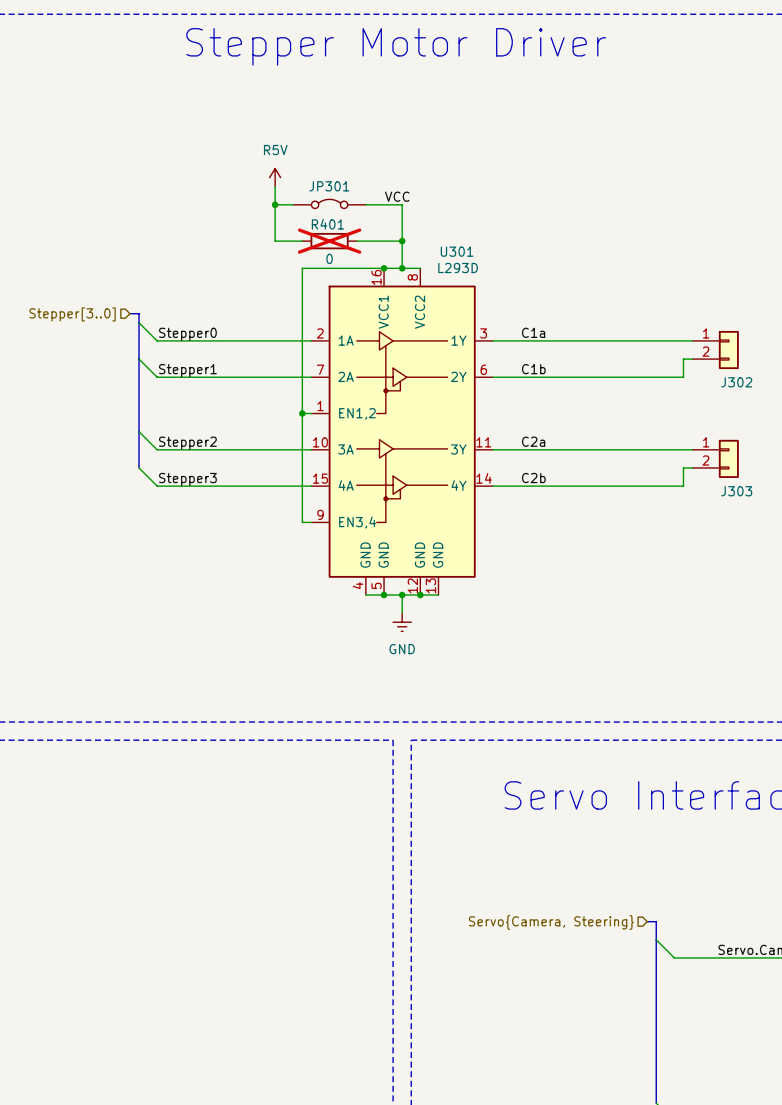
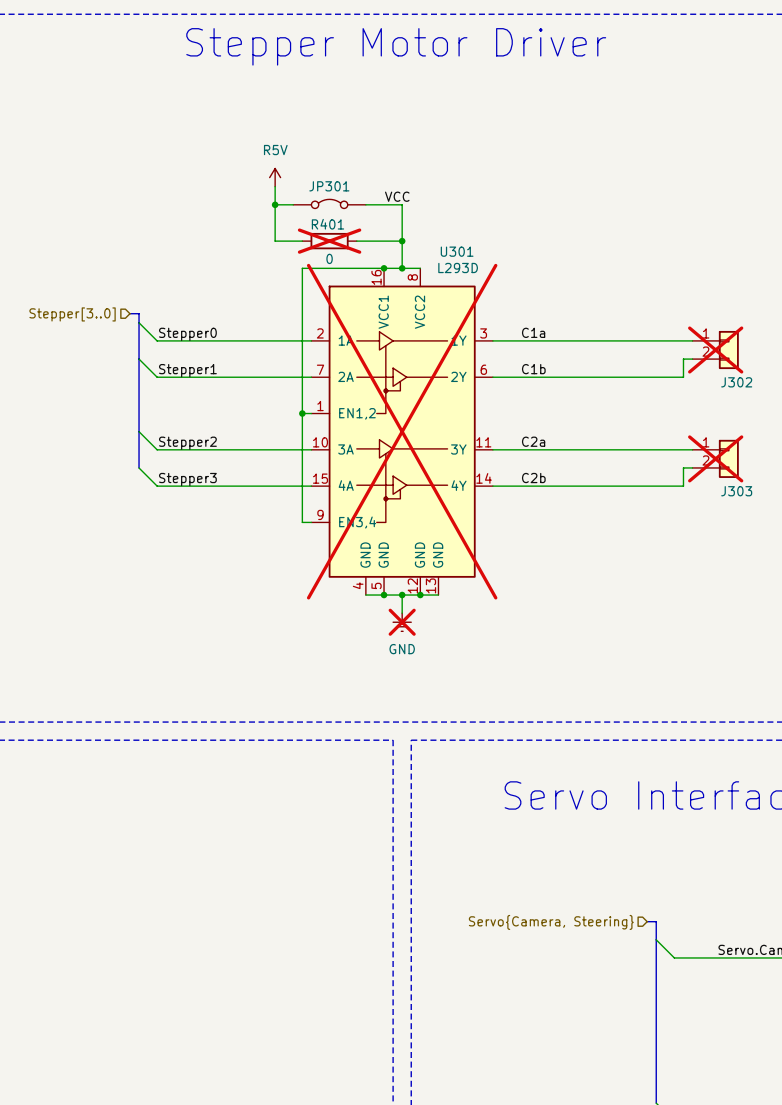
J302 do-not-place cross: none -> (715, 350)
U301 do-not-place cross: none -> (402, 431)
J303 do-not-place cross: none -> (715, 458)
power symbol do-not-place cross: none -> (402, 622)

